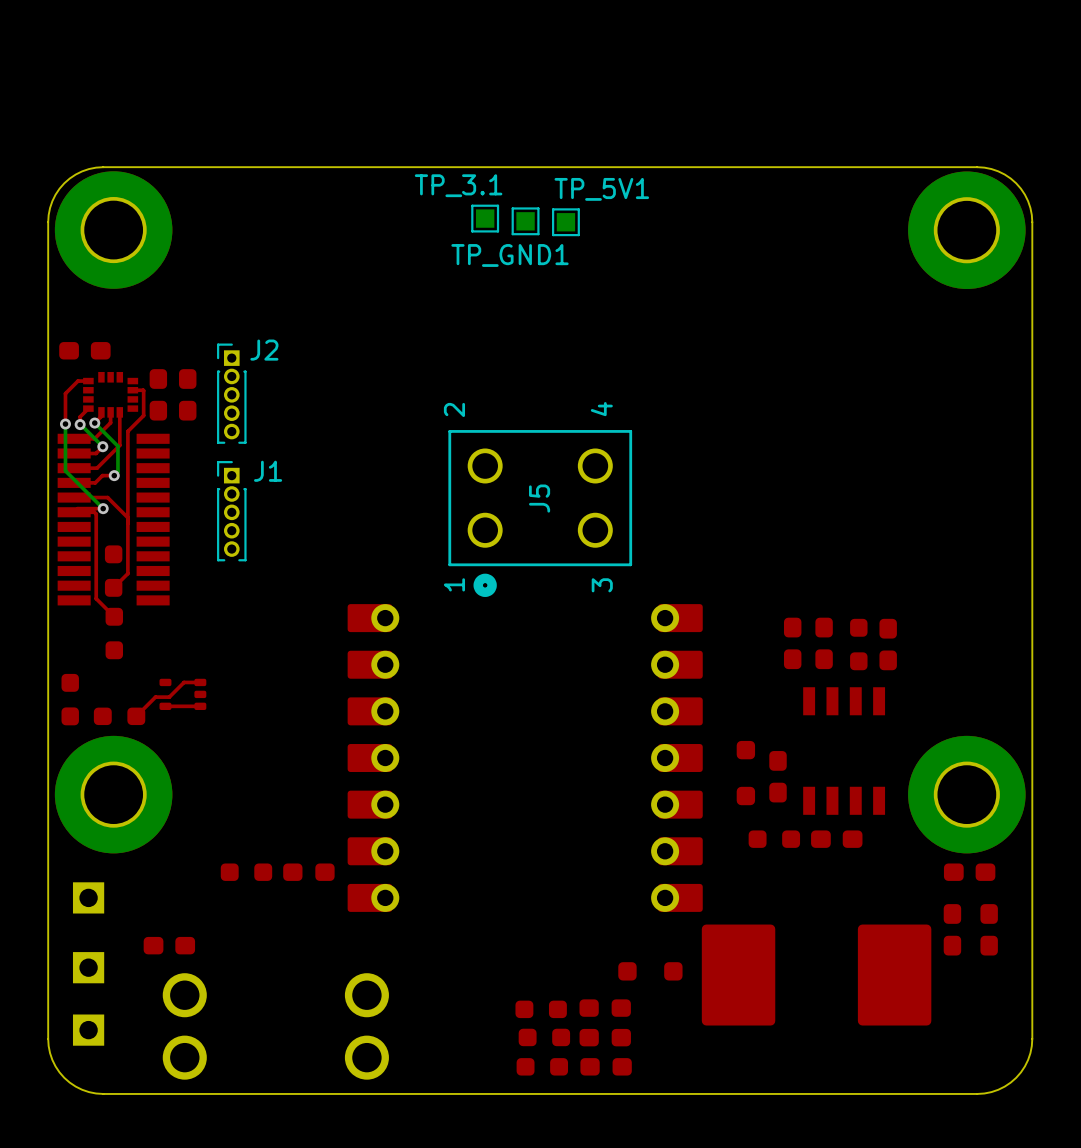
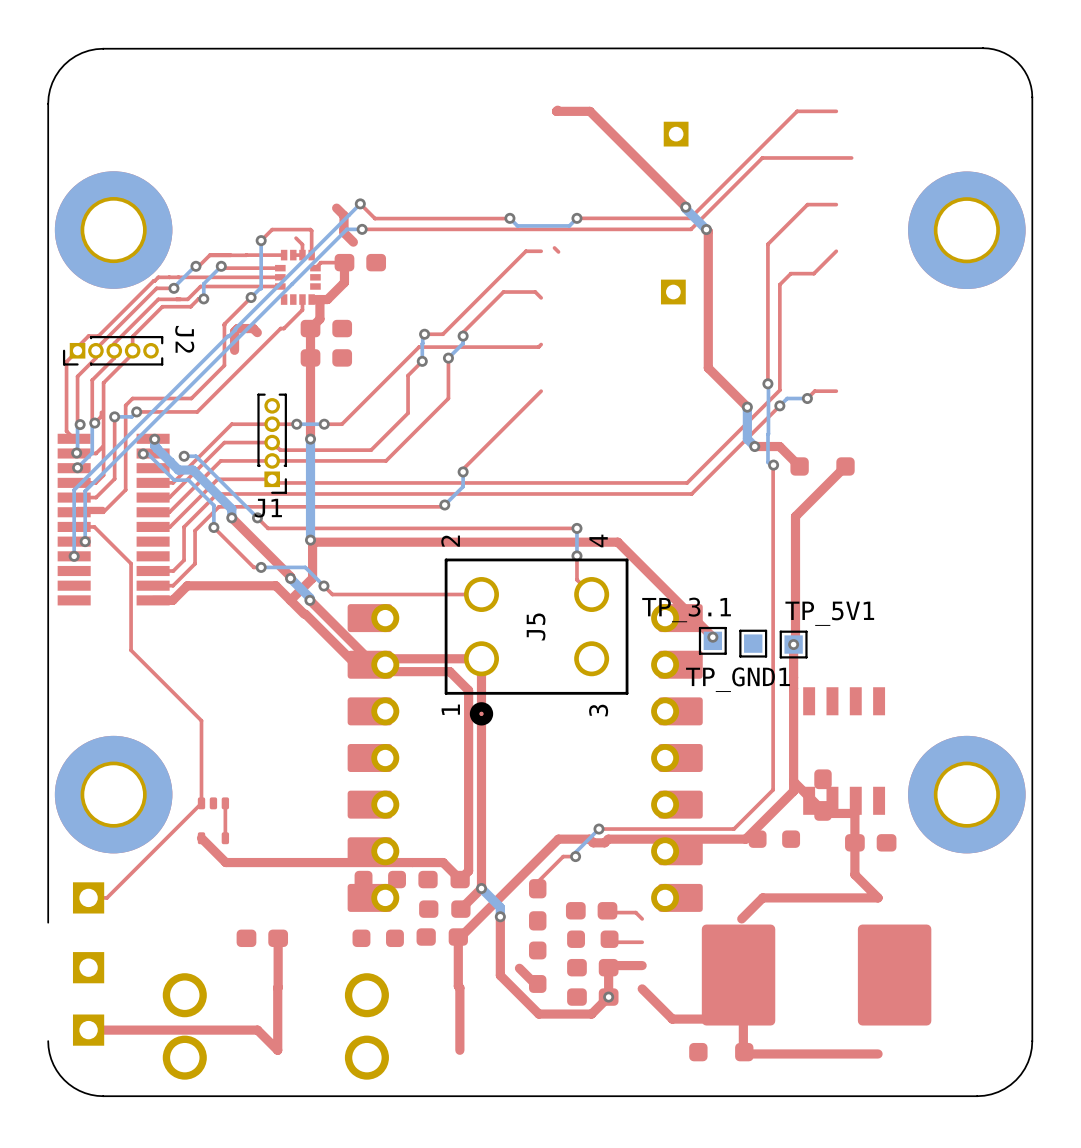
board edge: none -> (982, 48) (1004, 52) (1017, 62) (1029, 81) (1032, 97)
board edge: none -> (1032, 97) (1032, 222)
top track: none -> (557, 110) (556, 111) (589, 111) (685, 207)
top track: none -> (836, 111) (797, 111) (690, 218) (576, 218)
part: none -> (676, 134)
top track: none -> (851, 157) (762, 157) (691, 229) (362, 229)
top track: none -> (360, 203) (375, 218) (509, 218)
bottom track: none -> (360, 203) (74, 490) (74, 556)
via: none -> (360, 203)
top track: none -> (836, 204) (807, 204) (767, 244) (767, 383)
bottom track: none -> (685, 207) (706, 229)
via: none -> (685, 207)
top track: none -> (336, 208) (344, 215) (344, 232) (353, 242)
TP_3.1 position: (485, 218) -> (712, 640)
via: none -> (509, 218)
bottom track: none -> (576, 218) (569, 225) (517, 225) (509, 218)
via: none -> (576, 218)
TP_GND1 position: (525, 221) -> (753, 643)
TP_5V1 position: (565, 222) -> (793, 644)
board edge: (1032, 222) (1028, 201) (1016, 183) (998, 171) (977, 167) (103, 167) (82, 171) (64, 183) (52, 201) (48, 222) -> (983, 48) (96, 49) (82, 52) (69, 60) (59, 70) (50, 89) (48, 103) (48, 222)
bottom track: none -> (362, 229) (346, 229) (85, 491) (85, 541)
via: none -> (362, 229)
top track: none -> (706, 229) (708, 231) (708, 368) (747, 407)
via: none -> (706, 229)
top track: none -> (296, 238) (302, 244) (302, 255) (293, 255)
top track: none -> (261, 240) (272, 229) (310, 229) (311, 255)
bottom track: none -> (261, 240) (261, 288) (251, 297)
via: none -> (261, 240)
top track: none -> (554, 247) (558, 251)
top track: none -> (541, 251) (525, 251) (442, 334) (424, 334)
top track: none -> (836, 251) (813, 273) (790, 273) (779, 284) (779, 390) (687, 482) (275, 482) (272, 479) (217, 479) (170, 526) (153, 526)
top track: none -> (246, 255) (209, 255) (198, 266) (195, 266)
top track: none -> (284, 255) (246, 255)
part: none -> (360, 262)
bottom track: none -> (195, 266) (173, 288)
via: none -> (195, 266)
bottom track: none -> (221, 266) (203, 283) (203, 298)
via: none -> (221, 266)
top track: none -> (280, 268) (221, 268)
top track: none -> (315, 268) (320, 262) (344, 262) (344, 282) (327, 299) (313, 299)
top track: none -> (280, 286) (200, 286) (187, 299) (158, 299) (114, 343) (114, 358) (92, 380) (92, 424)
top track: none -> (173, 288) (156, 288) (95, 349) (95, 358) (77, 376) (77, 424)
via: none -> (173, 288)
part: none -> (673, 292)
via: none -> (251, 297)
top track: none -> (541, 297) (535, 292) (503, 292) (463, 332) (463, 336)
via: none -> (203, 298)
top track: none -> (302, 299) (302, 309) (283, 328) (280, 328) (197, 411) (136, 411)
top track: none -> (319, 299) (319, 319) (310, 328) (310, 439)
part: none -> (326, 328)
top track: none -> (257, 332) (253, 328) (237, 328) (234, 331) (234, 350)
bottom track: none -> (424, 334) (422, 336) (422, 361)
via: none -> (424, 334)
bottom track: none -> (463, 336) (463, 343) (448, 358)
via: none -> (463, 336)
top track: none -> (541, 344) (538, 347) (419, 347) (341, 424) (324, 424)
part: (84, 350) -> none
J2 name position: J2 (264, 350) -> J2 (184, 339)
part: none -> (326, 357)
top track: none -> (448, 358) (448, 398) (386, 460) (220, 460) (169, 512) (153, 512)
via: none -> (448, 358)
top track: none -> (422, 361) (408, 375) (408, 413) (371, 450) (280, 450) (272, 442) (224, 442) (169, 497) (153, 497)
via: none -> (422, 361)
top track: (88, 381) (78, 381) (65, 393) (65, 424) -> none
bottom track: none -> (767, 383) (767, 462) (773, 465)
via: none -> (767, 383)
top track: (132, 390) (143, 390) (143, 415) (127, 431) (127, 573) (113, 587) -> none
top track: none -> (541, 391) (463, 469) (463, 471)
top track: none -> (836, 391) (814, 391) (807, 398)
J2 rotation: 0° (231, 393) -> 90° counterclockwise (113, 350)
J2 position: (231, 393) -> (113, 350)
part rotation: 0° (110, 394) -> 90° clockwise (297, 277)
part position: (110, 394) -> (297, 277)
part: (158, 394) -> none
part: (187, 394) -> none
bottom track: none -> (807, 398) (787, 398) (779, 405)
via: none -> (807, 398)
top track: none -> (779, 405) (691, 493) (217, 493) (184, 527) (184, 560) (173, 571) (153, 571)
via: none -> (779, 405)
bottom track: none -> (747, 407) (747, 439) (754, 446)
via: none -> (747, 407)
top track: (88, 408) (80, 416) (80, 424) -> none
bottom track: none -> (136, 411) (131, 416) (114, 416)
via: none -> (136, 411)
top track: (110, 412) (110, 422) (94, 438) (74, 438) -> (280, 277) (158, 277) (153, 280) (98, 336) (88, 336) (66, 361) (66, 431) (74, 438)
top track: (119, 412) (119, 445) (97, 468) (74, 468) -> none
via: none -> (114, 416)
bottom track: (94, 423) (117, 446) (117, 471) (114, 475) -> none
bottom track: (65, 424) (65, 470) (103, 508) -> none
via: (65, 424) -> none
bottom track: none -> (77, 424) (76, 453)
bottom track: (80, 424) (102, 446) -> none
bottom track: none -> (92, 424) (92, 453) (77, 467)
top track: none -> (296, 424) (231, 424) (173, 482) (153, 482)
via: none -> (296, 424)
bottom track: none -> (324, 424) (296, 424)
via: none -> (324, 424)
bottom track: none -> (154, 439) (154, 445) (178, 470) (192, 470) (231, 509) (231, 517)
via: none -> (154, 439)
bottom track: none -> (310, 439) (310, 540)
via: none -> (310, 439)
via: (102, 446) -> none
top track: none -> (754, 446) (779, 446) (799, 466)
via: none -> (754, 446)
via: none -> (76, 453)
bottom track: none -> (143, 453) (148, 453) (174, 480) (188, 480) (213, 505) (213, 527)
via: none -> (143, 453)
bottom track: none -> (184, 456) (195, 456) (257, 517)
via: none -> (184, 456)
top track: none -> (773, 465) (773, 789) (733, 829) (599, 829)
via: none -> (773, 465)
part: none -> (822, 466)
top track: none -> (845, 466) (795, 516) (793, 791) (745, 839) (608, 839) (604, 842) (593, 842) (589, 839) (558, 839) (460, 937) (458, 937) (459, 1050)
via: none -> (77, 467)
J1 name position: J1 (268, 471) -> J1 (268, 508)
bottom track: none -> (463, 471) (463, 486) (444, 505)
via: none -> (463, 471)
top track: (114, 475) (102, 475) (95, 482) -> (203, 298) (198, 298) (190, 306) (162, 306) (132, 336) (132, 353) (103, 382) (103, 475) (95, 482)
via: (114, 475) -> none
top track: (96, 497) (107, 497) (127, 517) -> (96, 497) (114, 478) (114, 416)
top track: none -> (444, 505) (442, 506) (218, 506) (195, 530) (195, 563) (173, 585) (153, 585)
via: none -> (444, 505)
via: (103, 508) -> none
J1 rotation: 0° (231, 511) -> 180° (272, 443)
J1 position: (231, 511) -> (272, 443)
top track: (94, 512) (96, 514) (96, 598) (114, 616) -> (94, 512) (103, 512) (125, 489) (125, 405) (132, 398) (191, 398) (224, 365) (224, 324) (251, 297)
J5 position: (540, 513) -> (536, 642)
top track: none -> (231, 517) (290, 578)
via: none -> (231, 517)
top track: none -> (257, 517) (268, 528) (576, 528)
via: none -> (257, 517)
top track: none -> (74, 526) (94, 526) (131, 563) (131, 650) (201, 720) (201, 803) (106, 897) (88, 897)
top track: none -> (213, 527) (253, 567) (261, 567)
via: none -> (213, 527)
bottom track: none -> (576, 528) (576, 555)
via: none -> (576, 528)
via: none -> (310, 540)
via: none -> (85, 541)
top track: none -> (312, 542) (312, 578) (290, 600)
top track: none -> (312, 542) (617, 542) (712, 637)
top track: none -> (576, 555) (576, 579) (591, 594)
via: none -> (576, 555)
via: none -> (74, 556)
bottom track: none -> (261, 567) (305, 567) (323, 586)
via: none -> (261, 567)
part: (113, 571) -> none
bottom track: none -> (290, 578) (309, 597) (309, 600)
via: none -> (290, 578)
top track: none -> (323, 586) (332, 594) (481, 594)
via: none -> (323, 586)
top track: none -> (153, 600) (172, 600) (187, 585) (275, 585) (304, 614)
top track: none -> (309, 600) (368, 658) (481, 658) (481, 888) (460, 909)
via: none -> (309, 600)
top track: none -> (305, 614) (362, 671) (449, 671) (468, 690) (468, 871) (460, 879) (443, 862) (225, 862) (201, 838)
part: (114, 633) -> none
via: none -> (712, 637)
part: (792, 643) -> none
part: (824, 643) -> none
via: none -> (793, 644)
part: (858, 644) -> none
part: (888, 644) -> none
top track: (200, 682) (184, 682) (169, 697) (155, 697) (136, 716) -> none
part rotation: 0° (182, 694) -> 90° counterclockwise (213, 820)
part position: (182, 694) -> (213, 820)
part: (70, 699) -> none
top track: (200, 706) (165, 706) -> none
part: (119, 716) -> none
part: (745, 773) -> none
part: (778, 776) -> none
top track: none -> (793, 781) (825, 813) (854, 813) (854, 874) (878, 897) (762, 897) (741, 918)
part: none -> (823, 795)
top track: none -> (225, 803) (225, 838)
bottom track: none -> (599, 829) (575, 852) (575, 856)
via: none -> (599, 829)
part: (836, 839) -> none
part: none -> (870, 842)
top track: none -> (575, 856) (563, 856) (537, 882) (537, 888)
via: none -> (575, 856)
part: (246, 872) -> none
part: (308, 872) -> none
part: (969, 872) -> none
part: none -> (380, 879)
part: none -> (444, 879)
bottom track: none -> (481, 888) (500, 907) (500, 916)
via: none -> (481, 888)
part: none -> (537, 904)
part: none -> (444, 909)
part: none -> (591, 910)
top track: none -> (607, 910) (609, 912) (635, 912) (642, 918)
top track: none -> (500, 916) (500, 975) (538, 1014) (591, 1014) (608, 997) (608, 967) (610, 965) (642, 965)
via: none -> (500, 916)
board edge: (48, 922) (48, 1038) (50, 1053) (55, 1066) (69, 1082) (82, 1089) (96, 1093) (977, 1093) (998, 1089) (1016, 1077) (1028, 1059) (1032, 1038) -> (48, 1041) (51, 1059) (60, 1075) (73, 1087) (97, 1095) (977, 1096) (998, 1092) (1016, 1080) (1028, 1062) (1032, 1038)
part: (952, 929) -> none
part: (989, 929) -> none
part: none -> (442, 937)
top track: none -> (278, 938) (277, 1050) (257, 1030) (88, 1030)
part: none -> (378, 938)
part: none -> (592, 939)
top track: none -> (609, 939) (612, 942) (642, 942)
part position: (169, 945) -> (262, 938)
part: none -> (537, 967)
part: none -> (592, 967)
top track: none -> (519, 968) (535, 983) (537, 983)
part position: (650, 971) -> (721, 1052)
top track: none -> (741, 988) (743, 990) (743, 1051) (746, 1053) (878, 1053)
top track: none -> (642, 992) (642, 988) (672, 1019) (711, 1019)
via: none -> (608, 997)
part footprint: [579, 999, 631, 1017] -> [567, 988, 619, 1006]
part: (541, 1009) -> none
part: (544, 1037) -> none
part: (605, 1037) -> none
part: (542, 1066) -> none
part: (606, 1066) -> none

